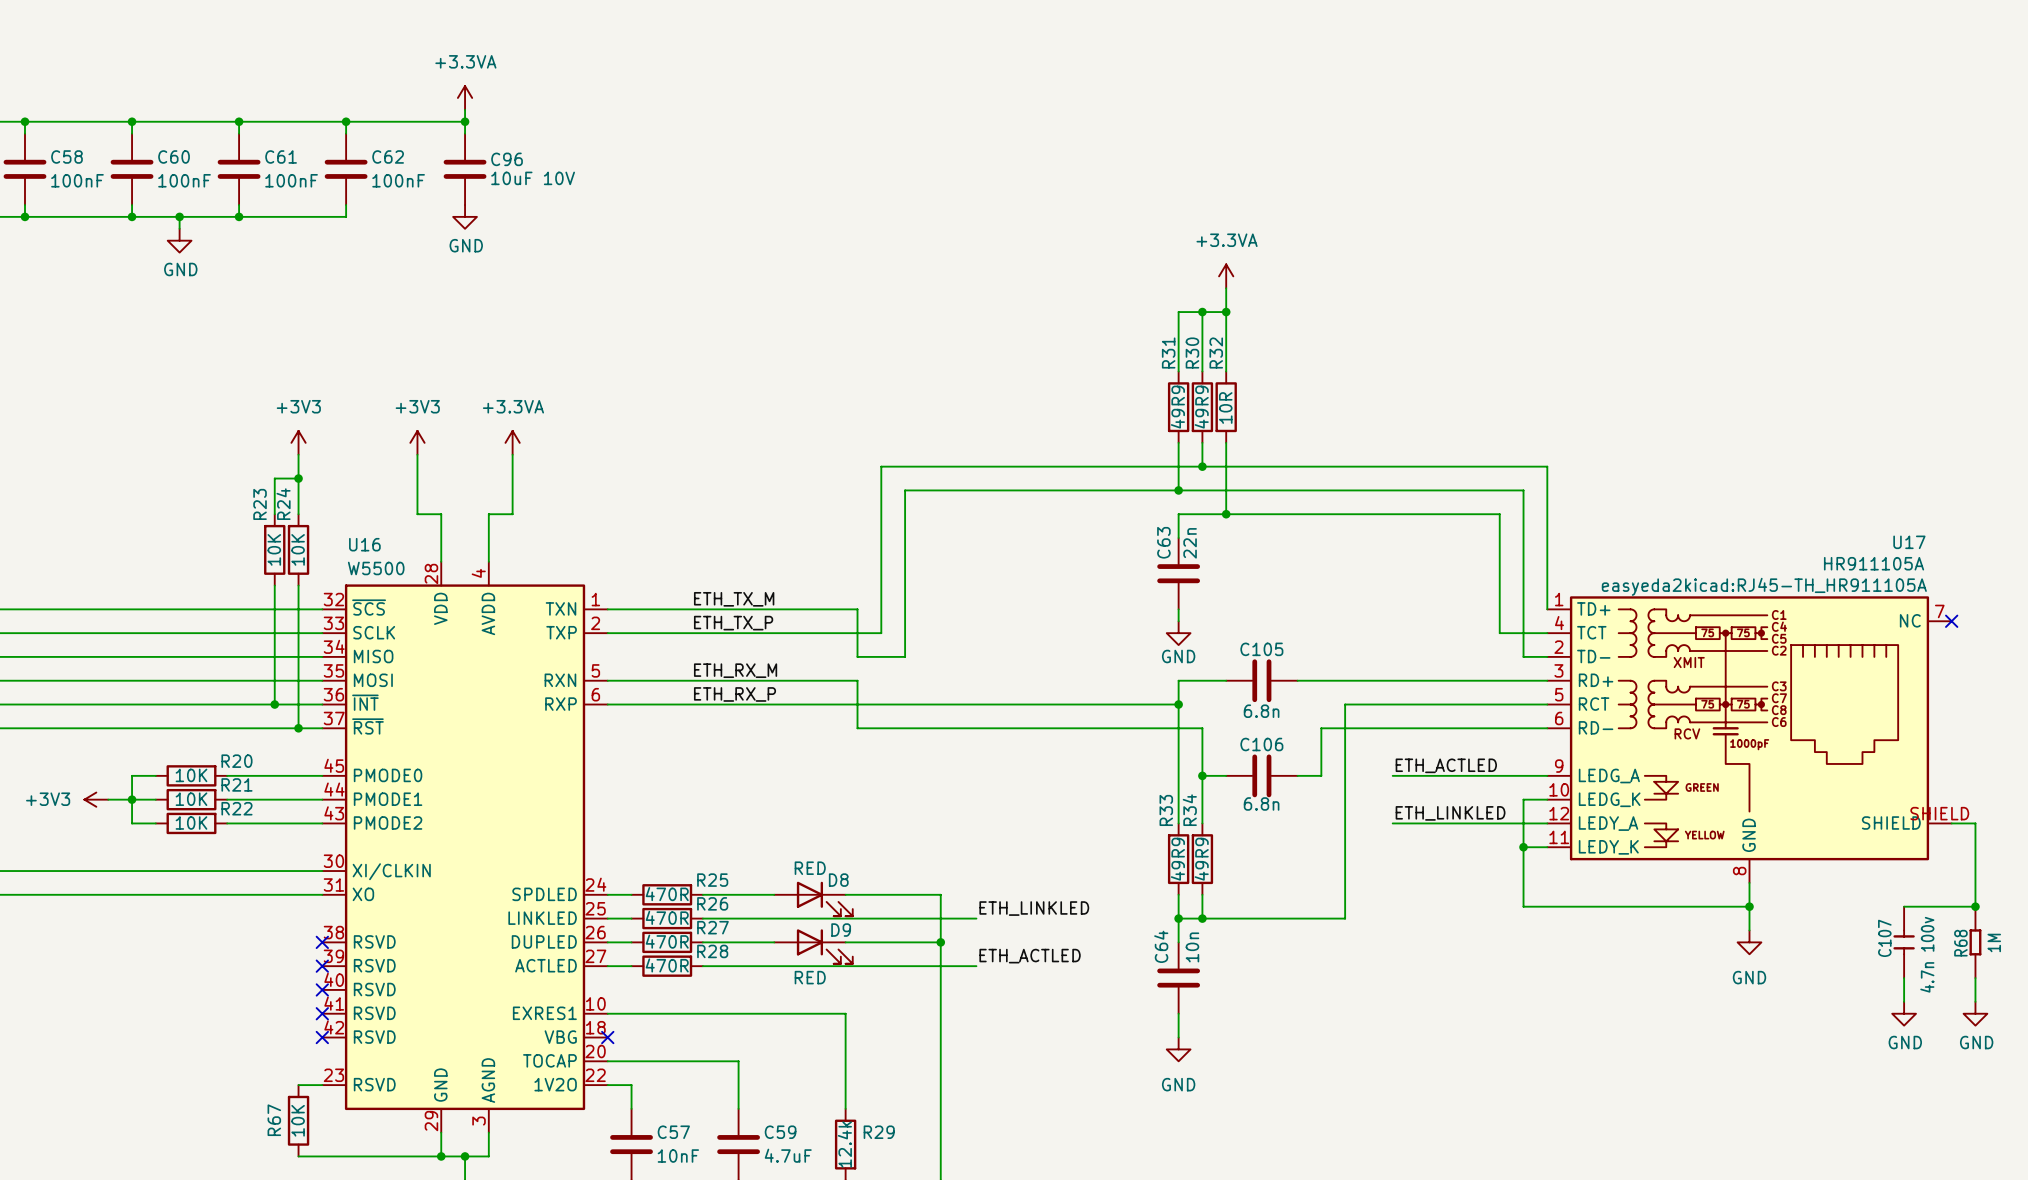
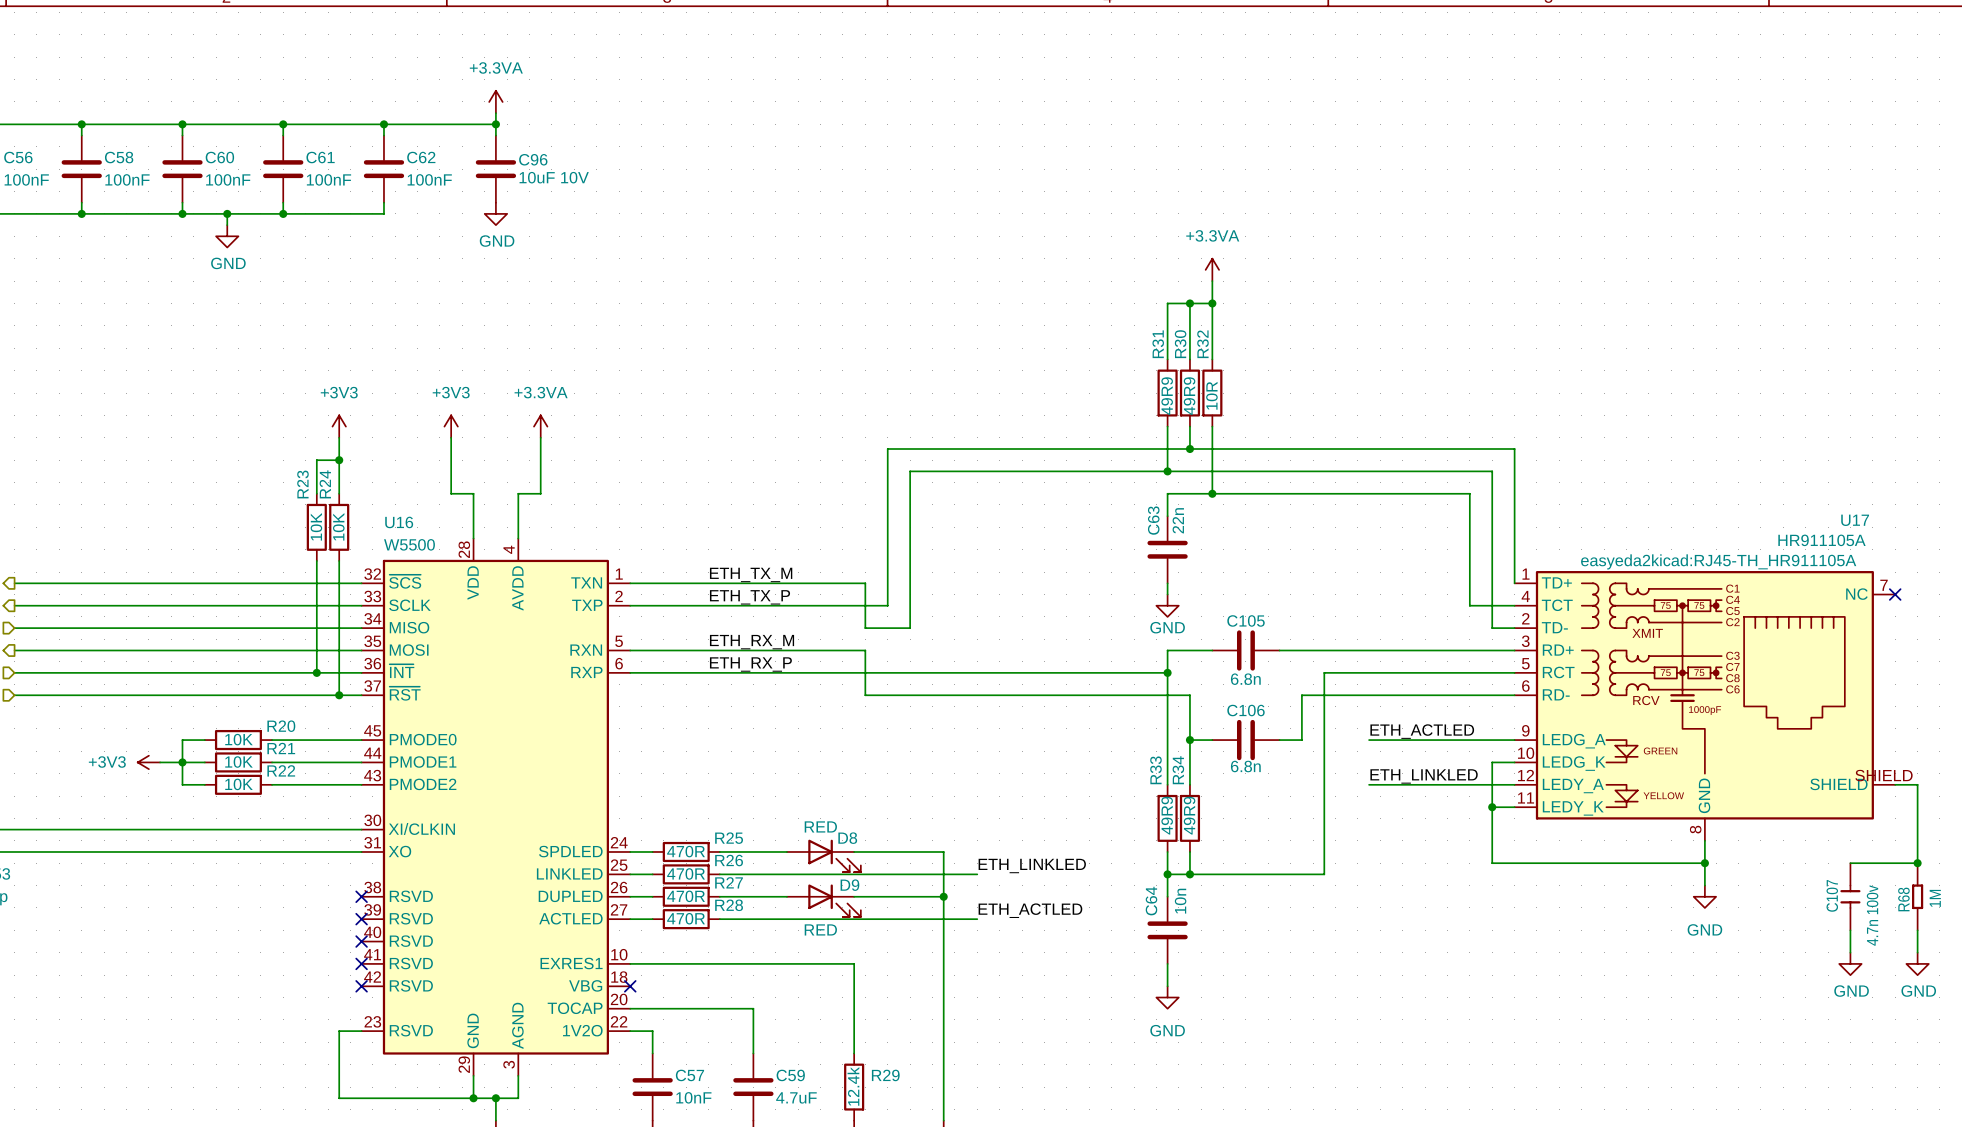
wire: none -> (339, 1031) (339, 1098)
R67: 10K (298, 1120) -> none

